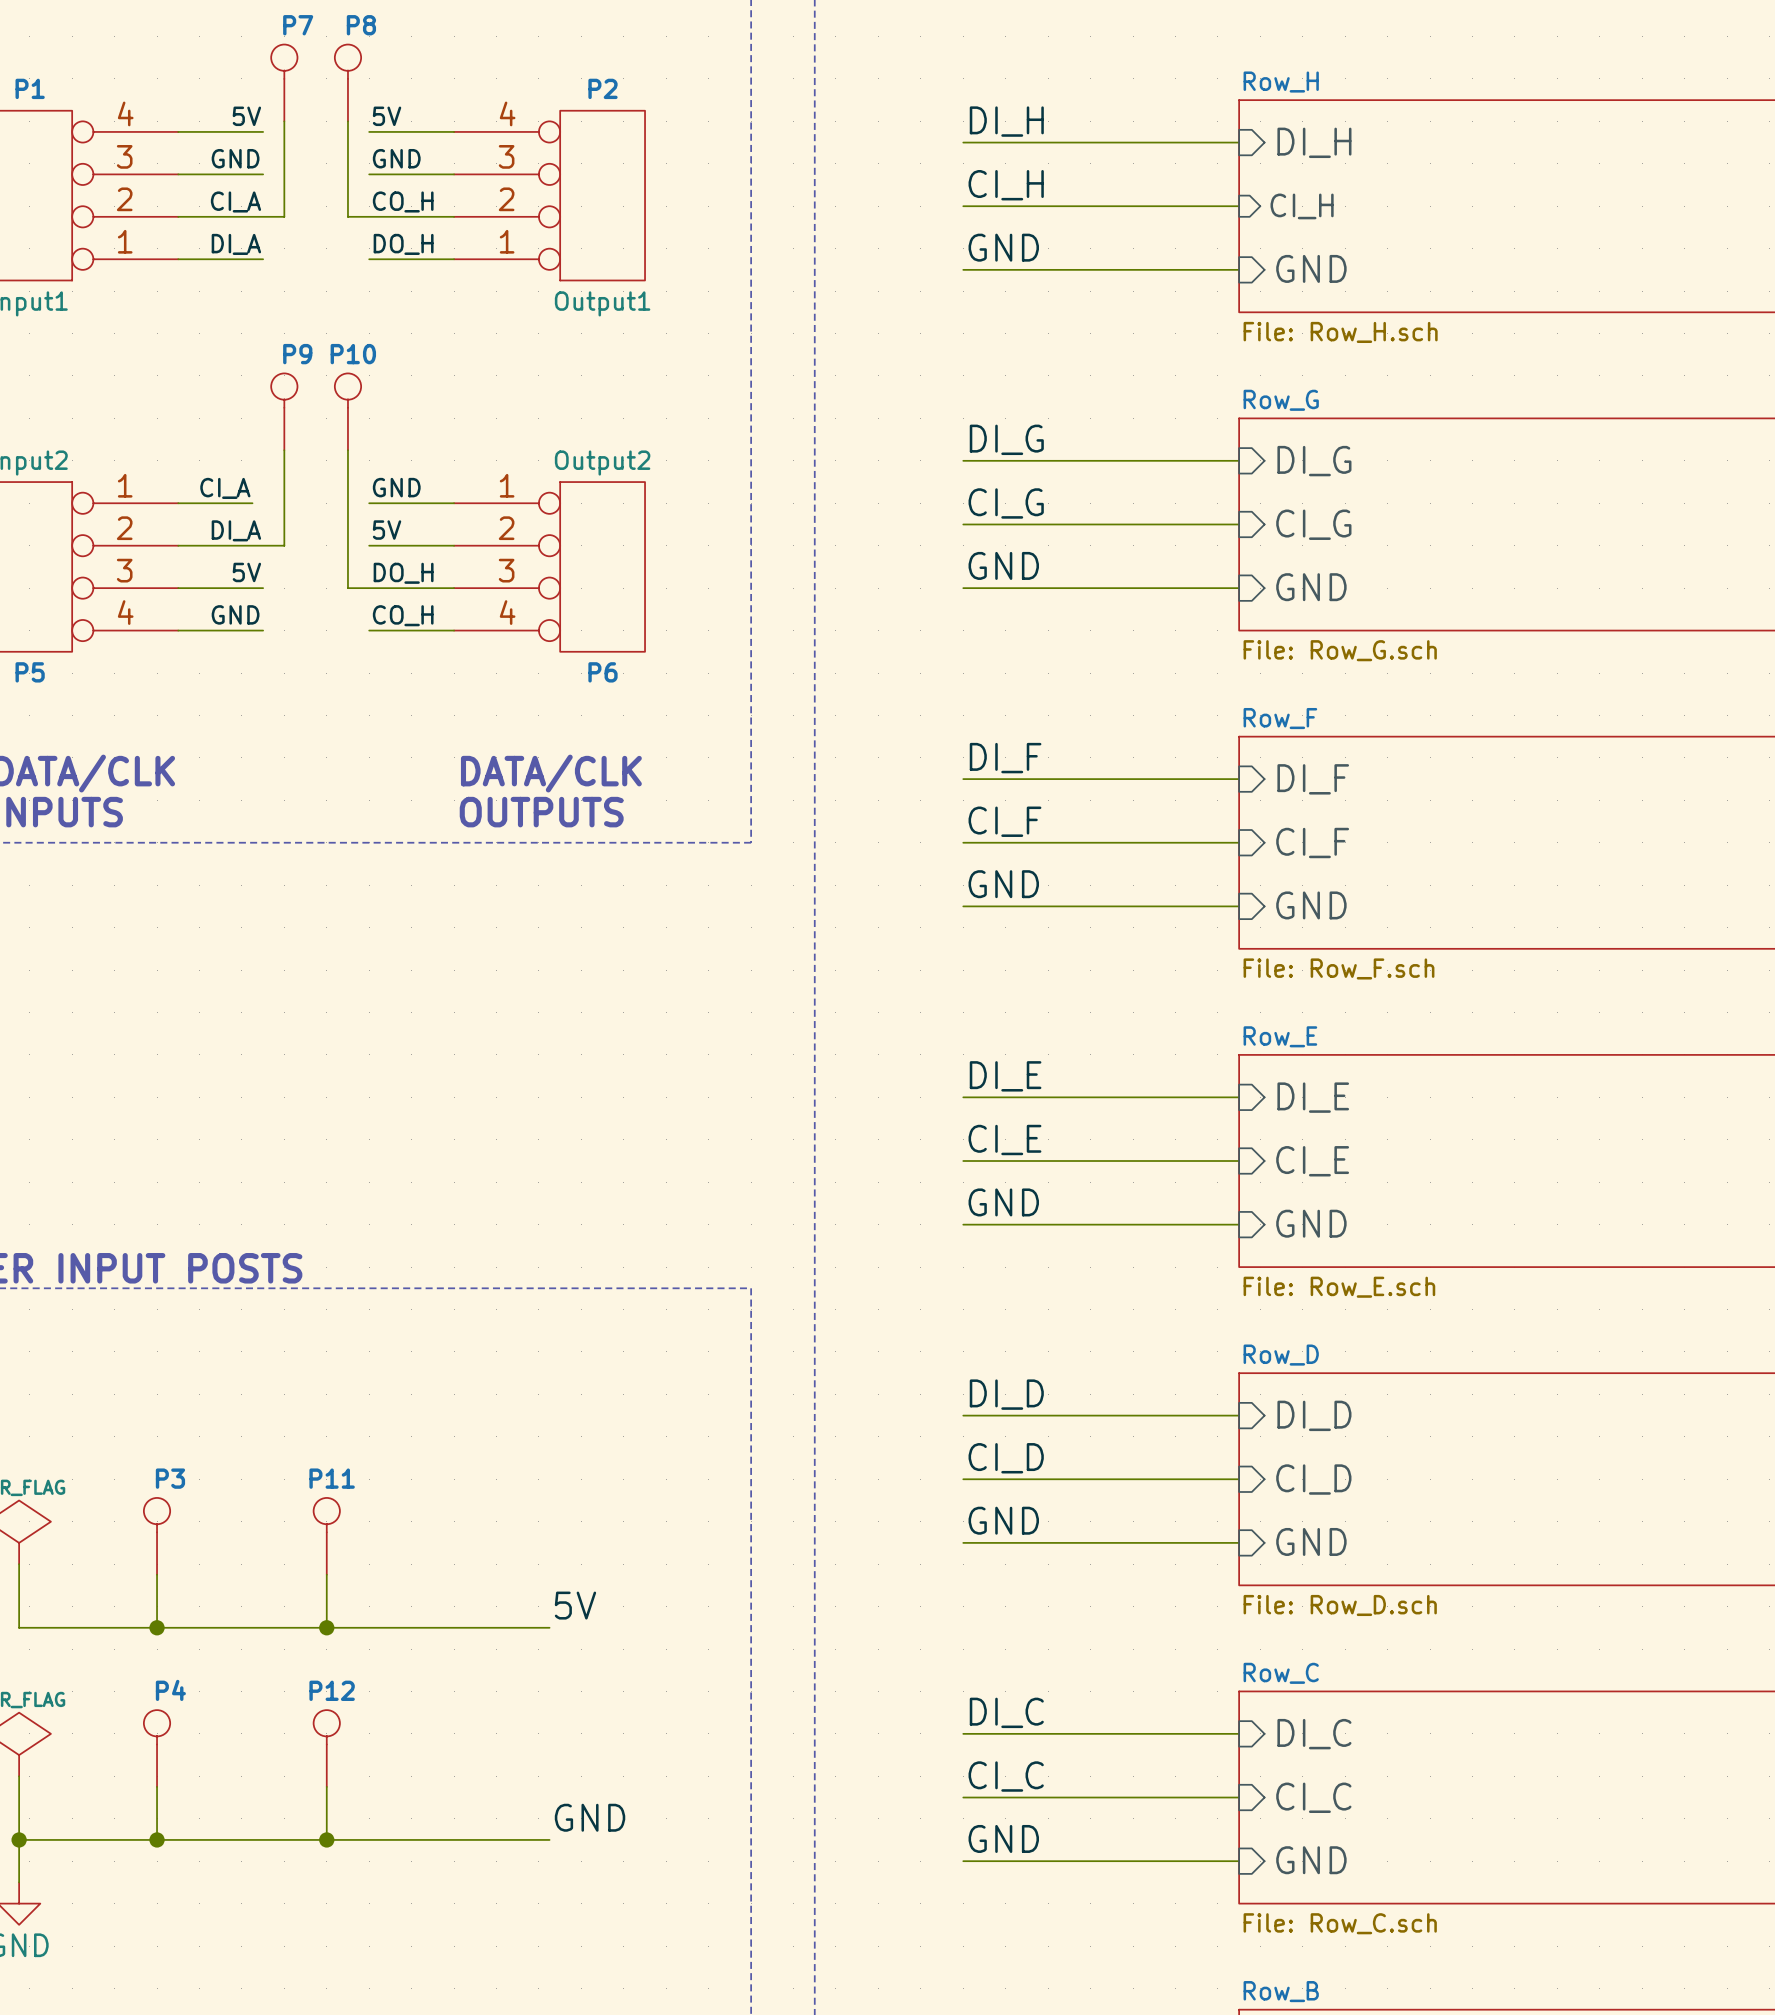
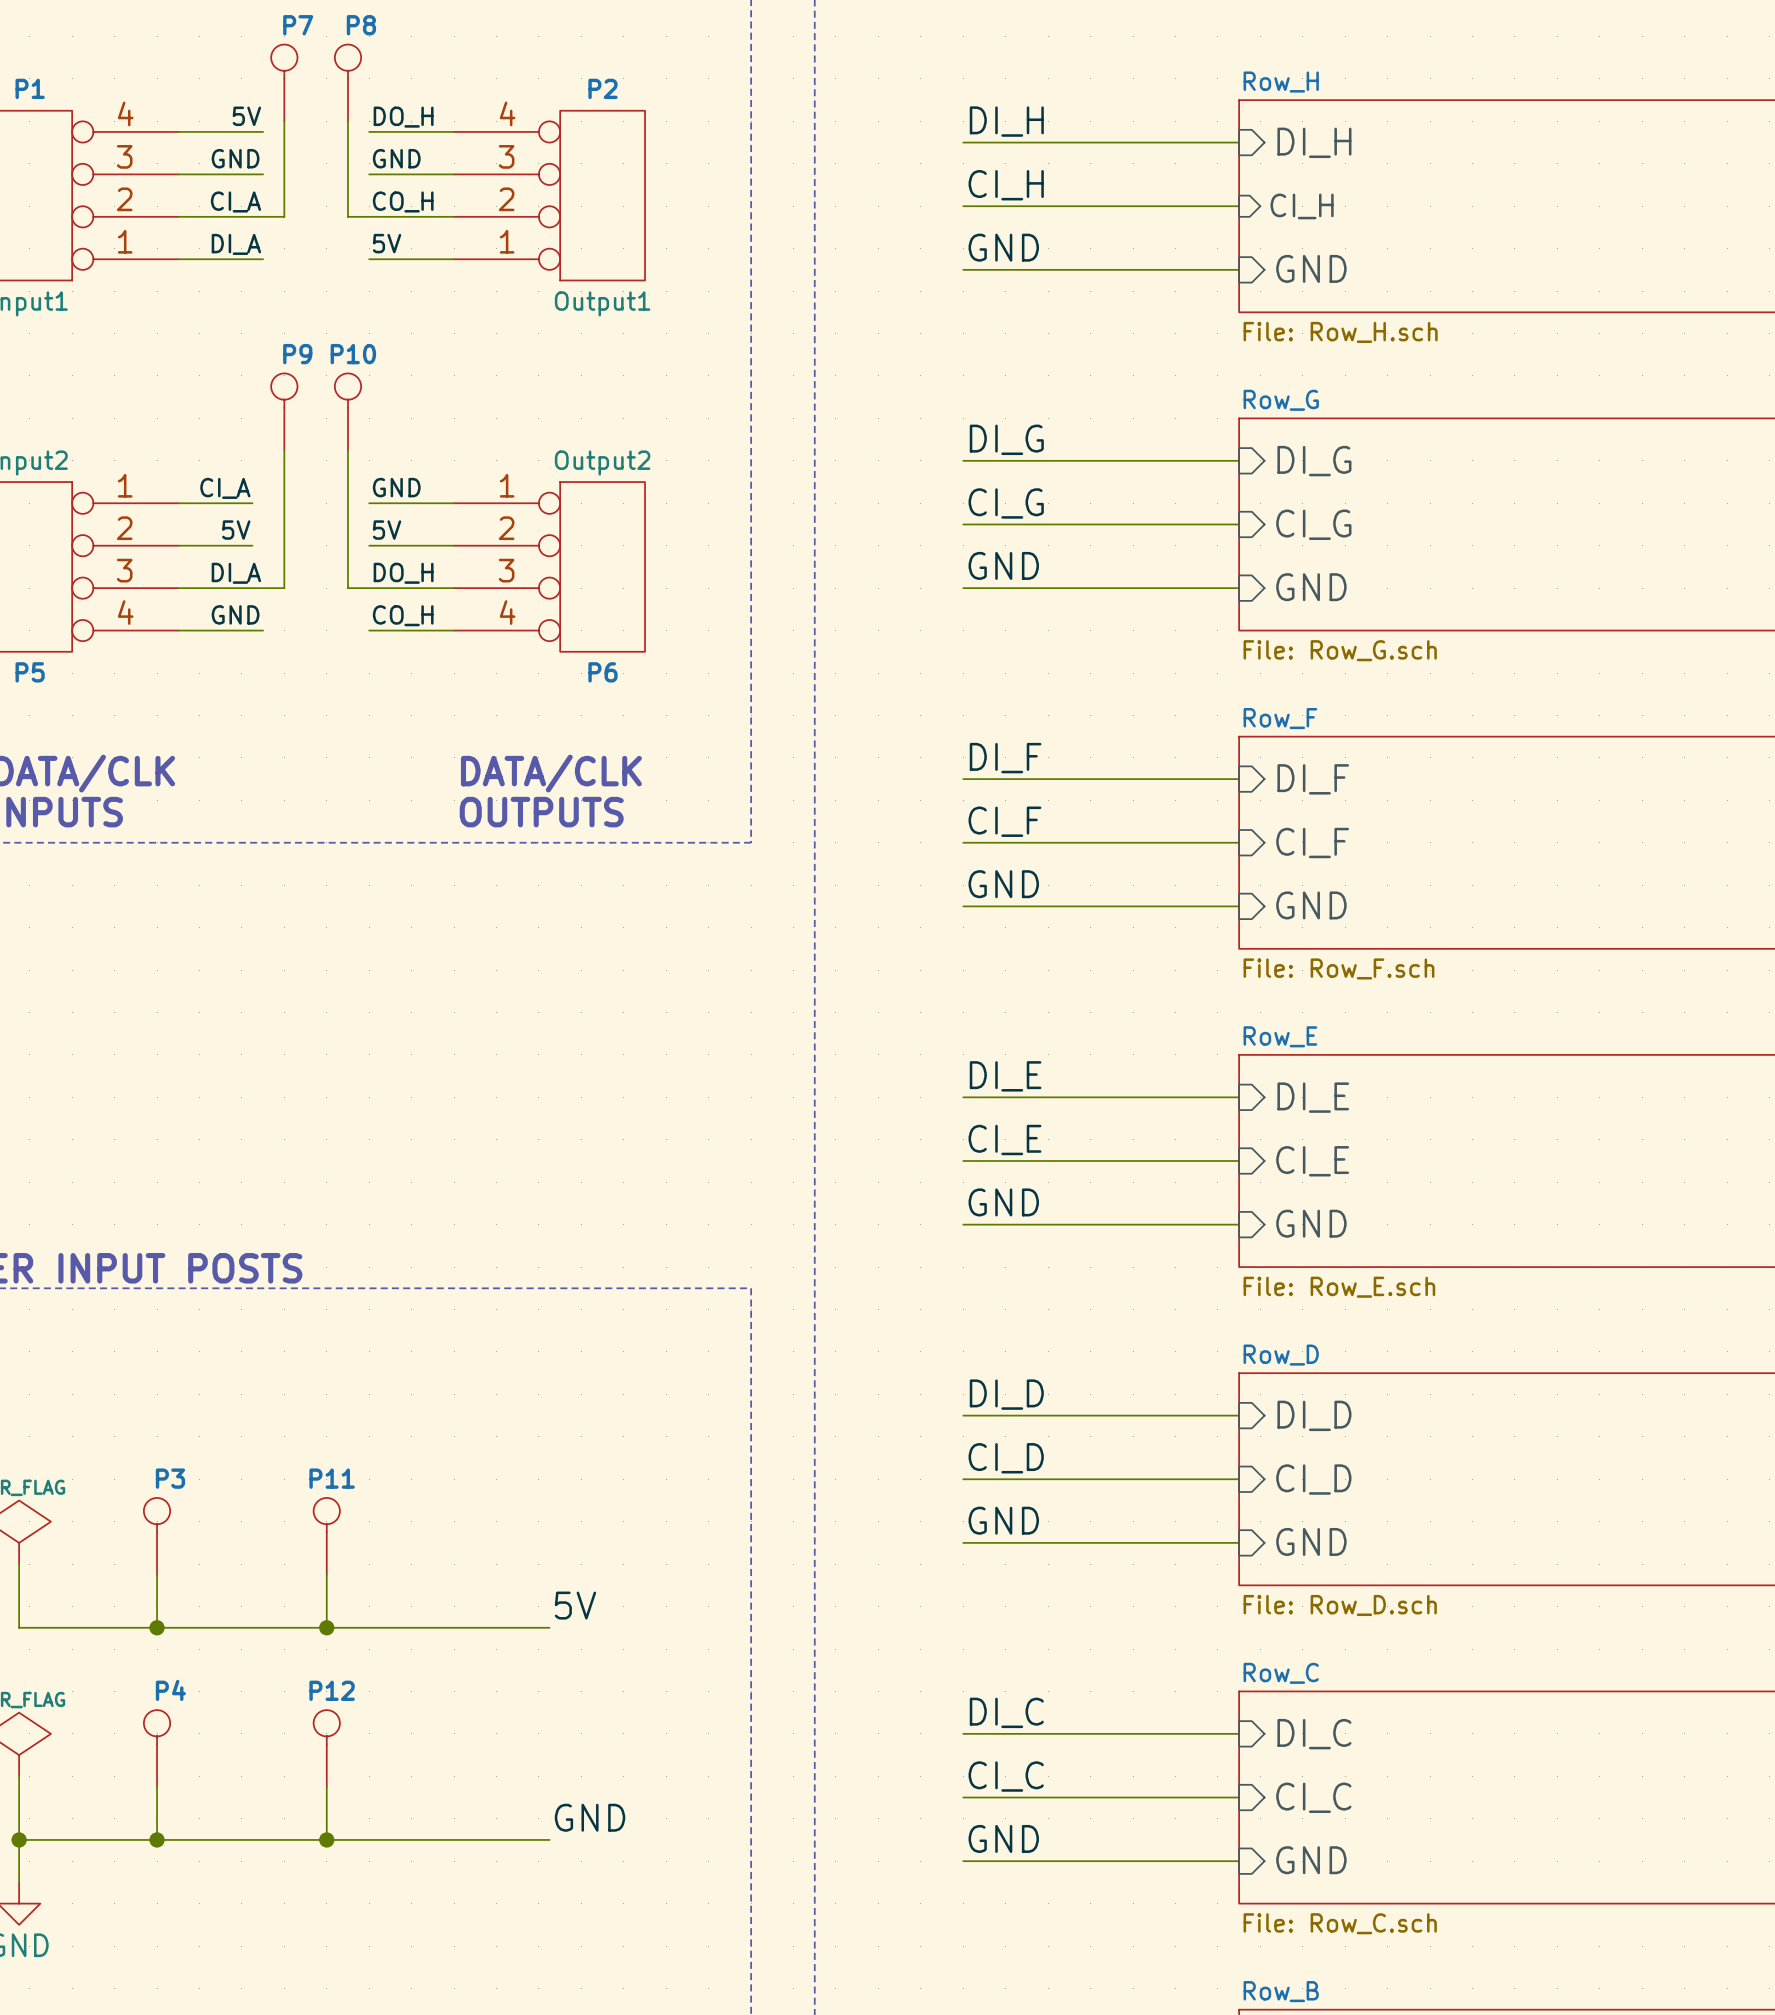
label: 5V (387, 116) -> DO_H (403, 117)
label: DO_H (403, 244) -> 5V (387, 243)
label: DI_A (236, 530) -> 5V (236, 530)
wire: (252, 545) (284, 545) -> (263, 588) (284, 588) (284, 545)
label: 5V (246, 572) -> DI_A (236, 573)

